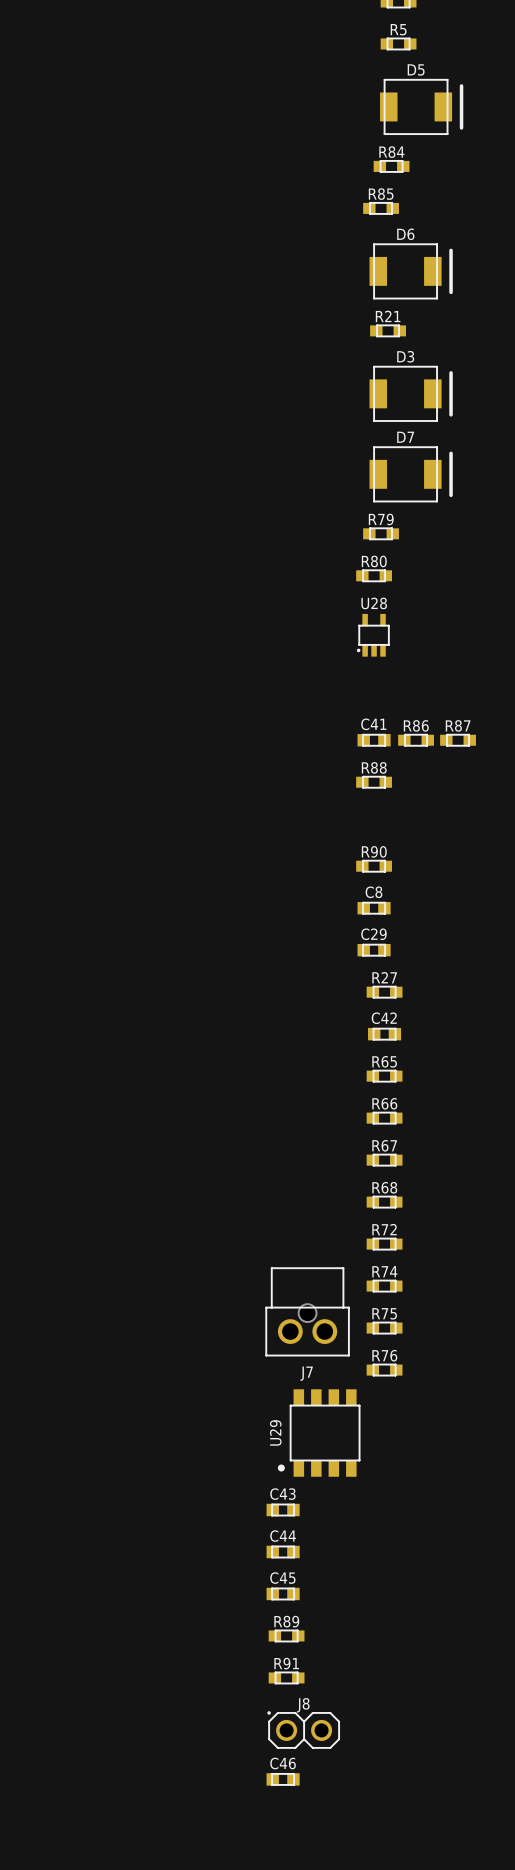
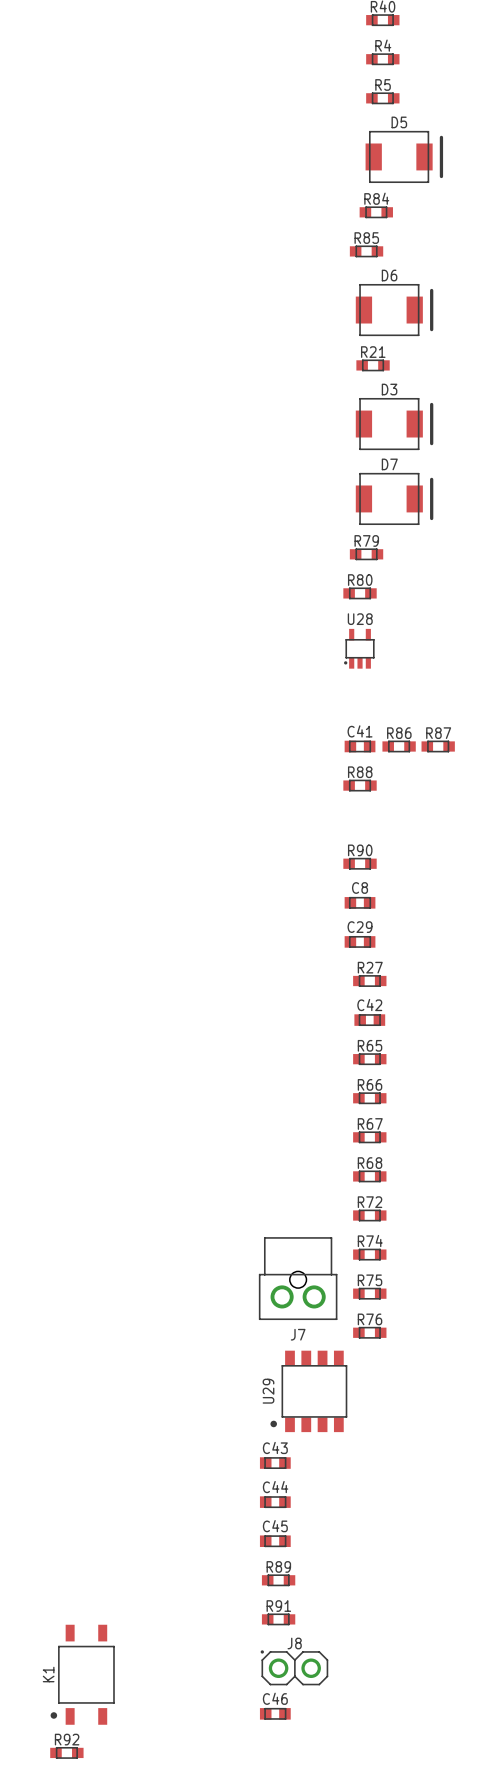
K1: none -> (82, 1674)
R92: none -> (66, 1752)

